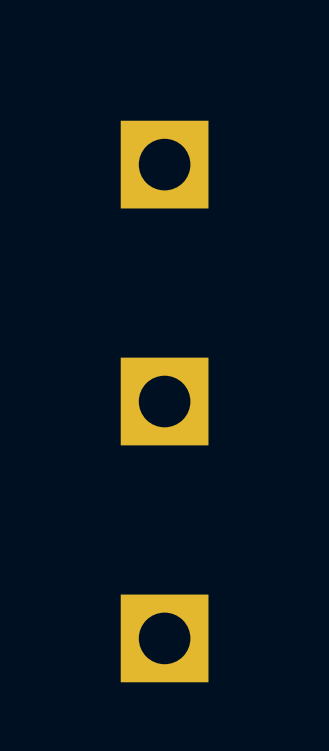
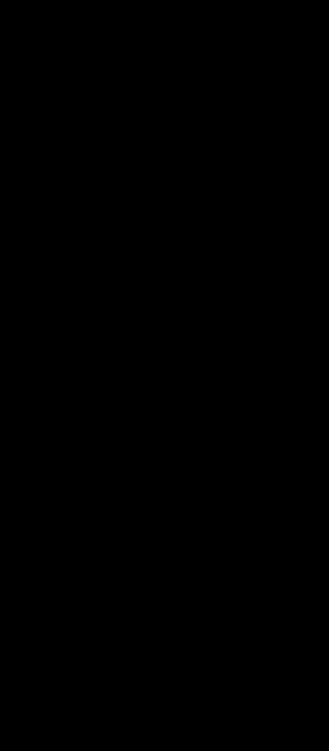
part: (164, 164) -> none
part: (164, 401) -> none
part: (164, 638) -> none

